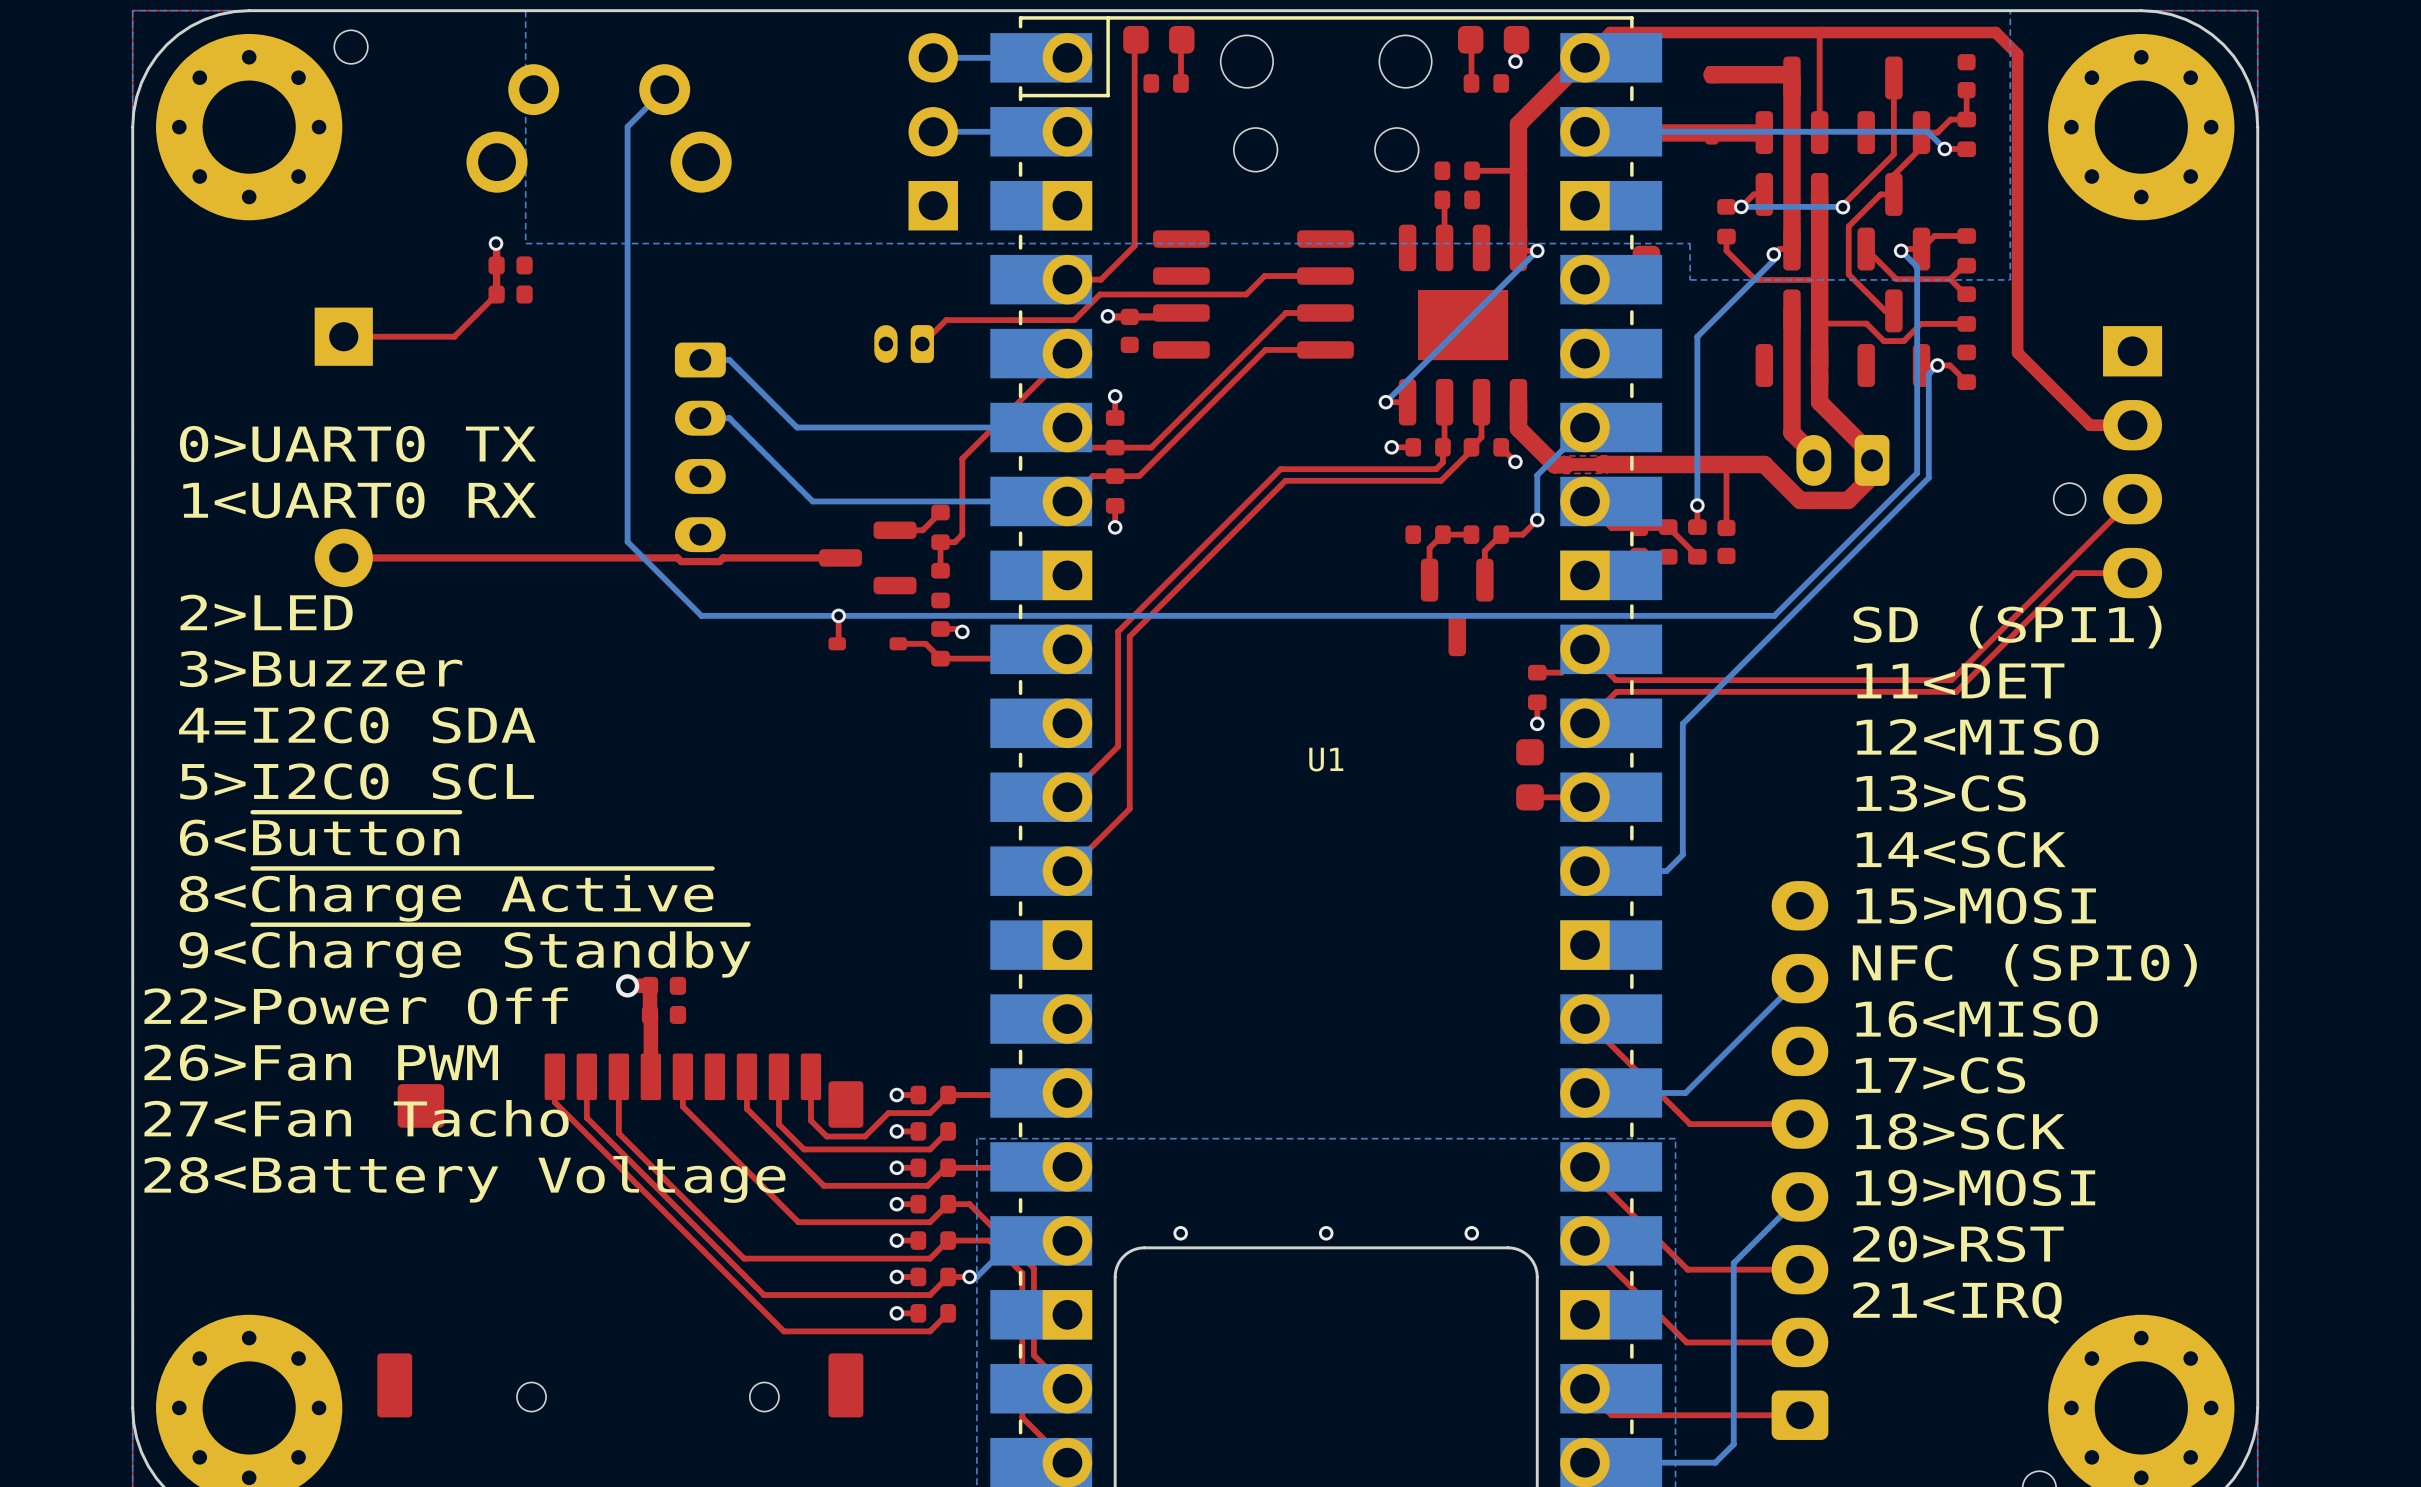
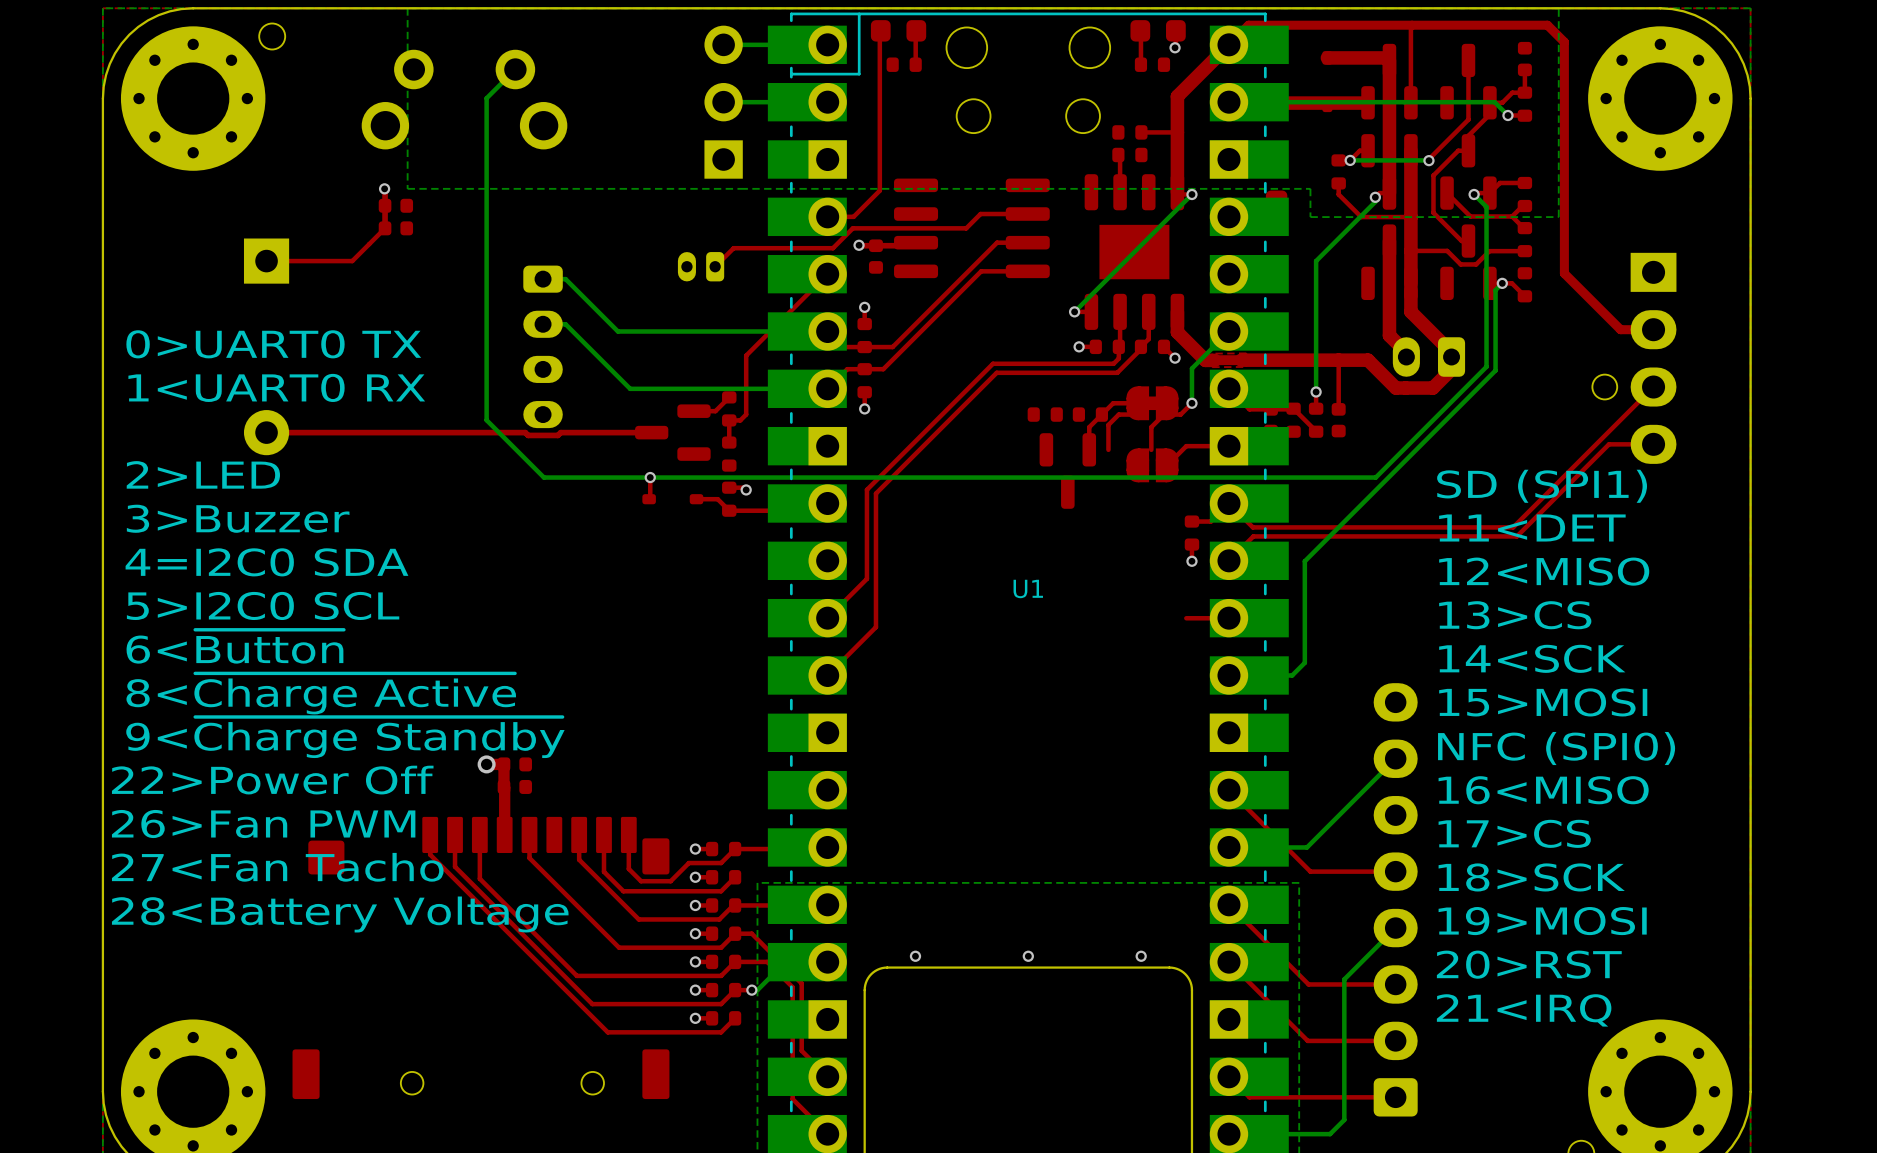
top track: none -> (1137, 403) (1113, 403) (1089, 427) (1089, 449)
part footprint: [1463, 525, 1510, 544] -> [1126, 386, 1179, 421]
part: none -> (1045, 414)
part position: (1428, 534) -> (1090, 414)
top track: none -> (1228, 446) (1186, 446) (1167, 465)
part: none -> (1152, 465)
part position: (1457, 607) -> (1067, 470)
part: (1529, 774) -> none

